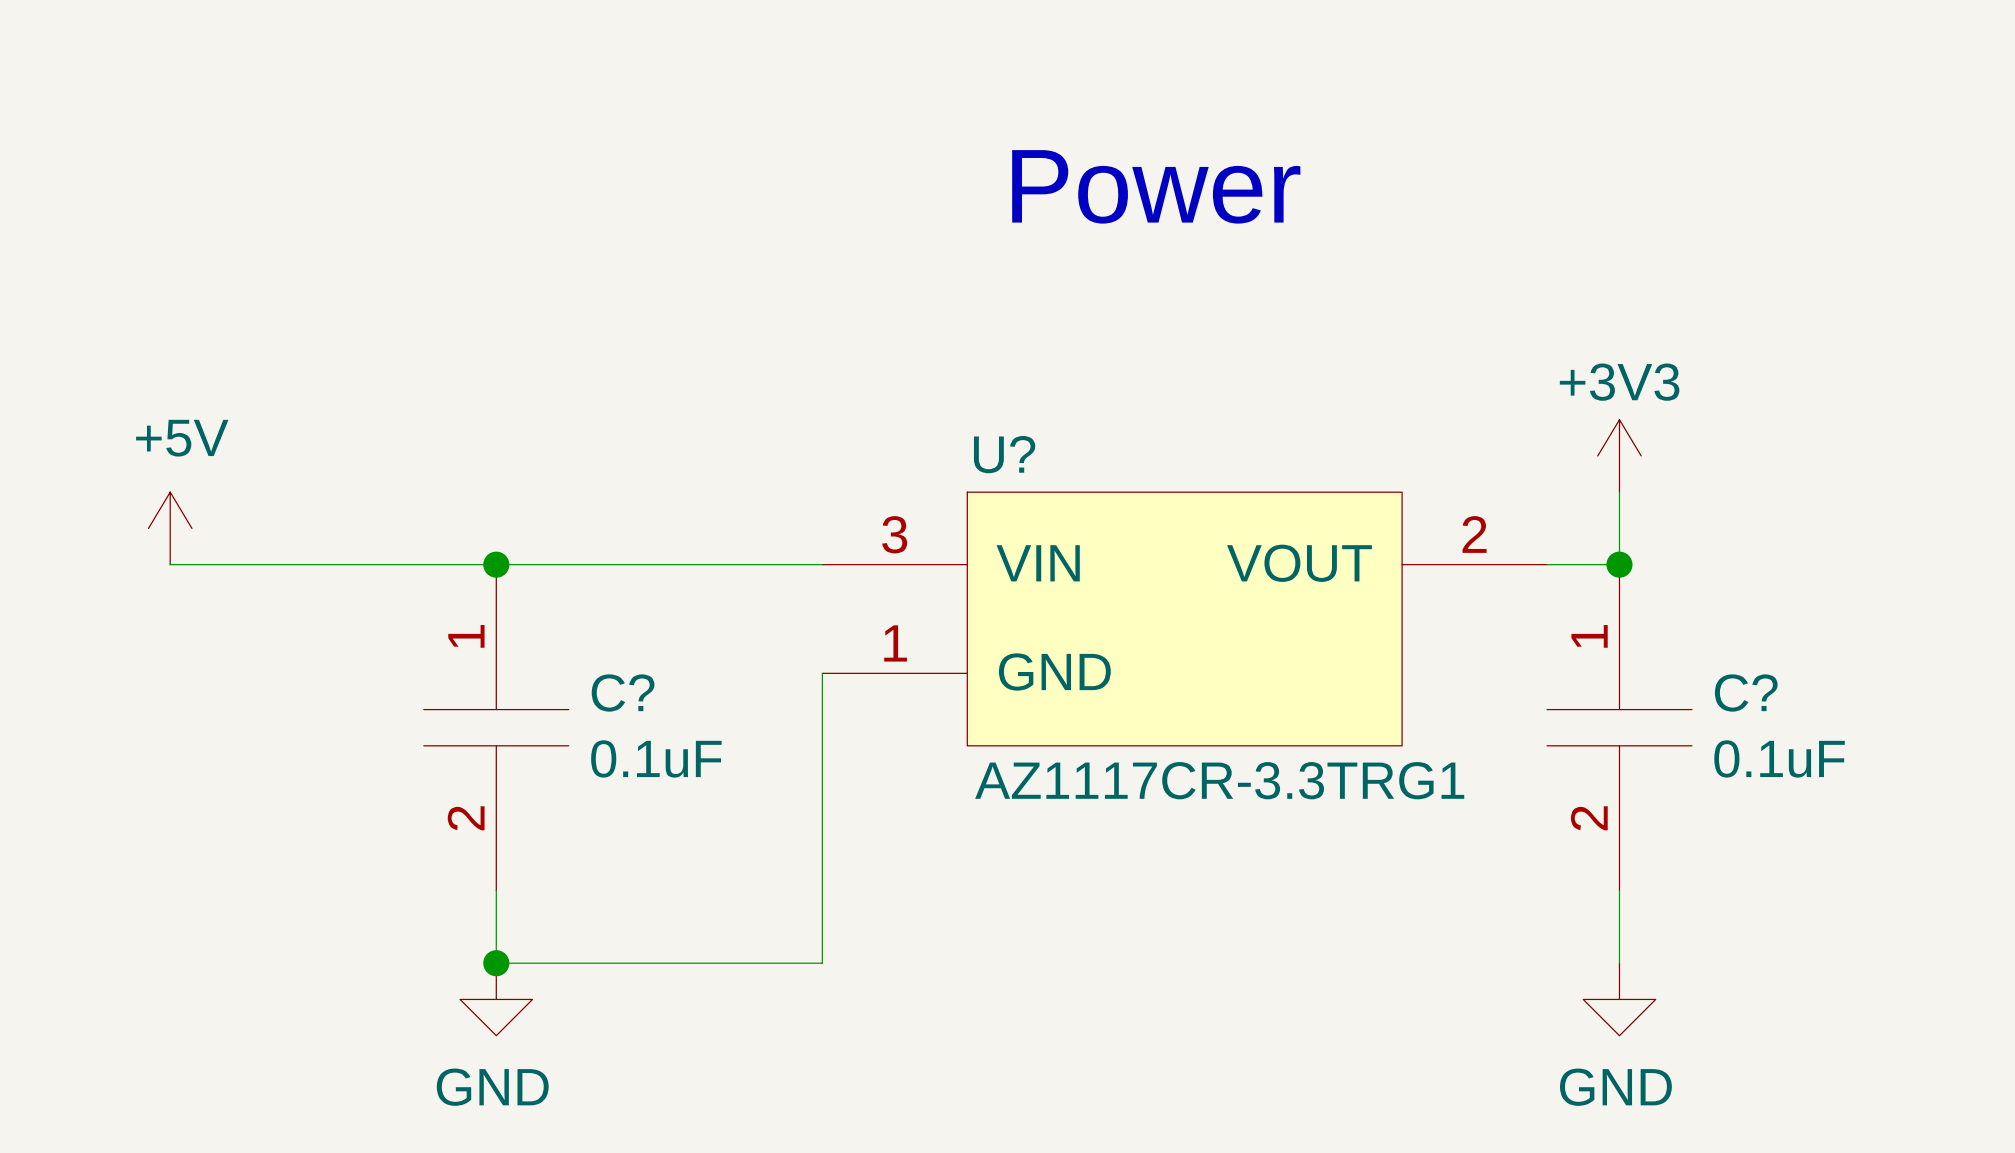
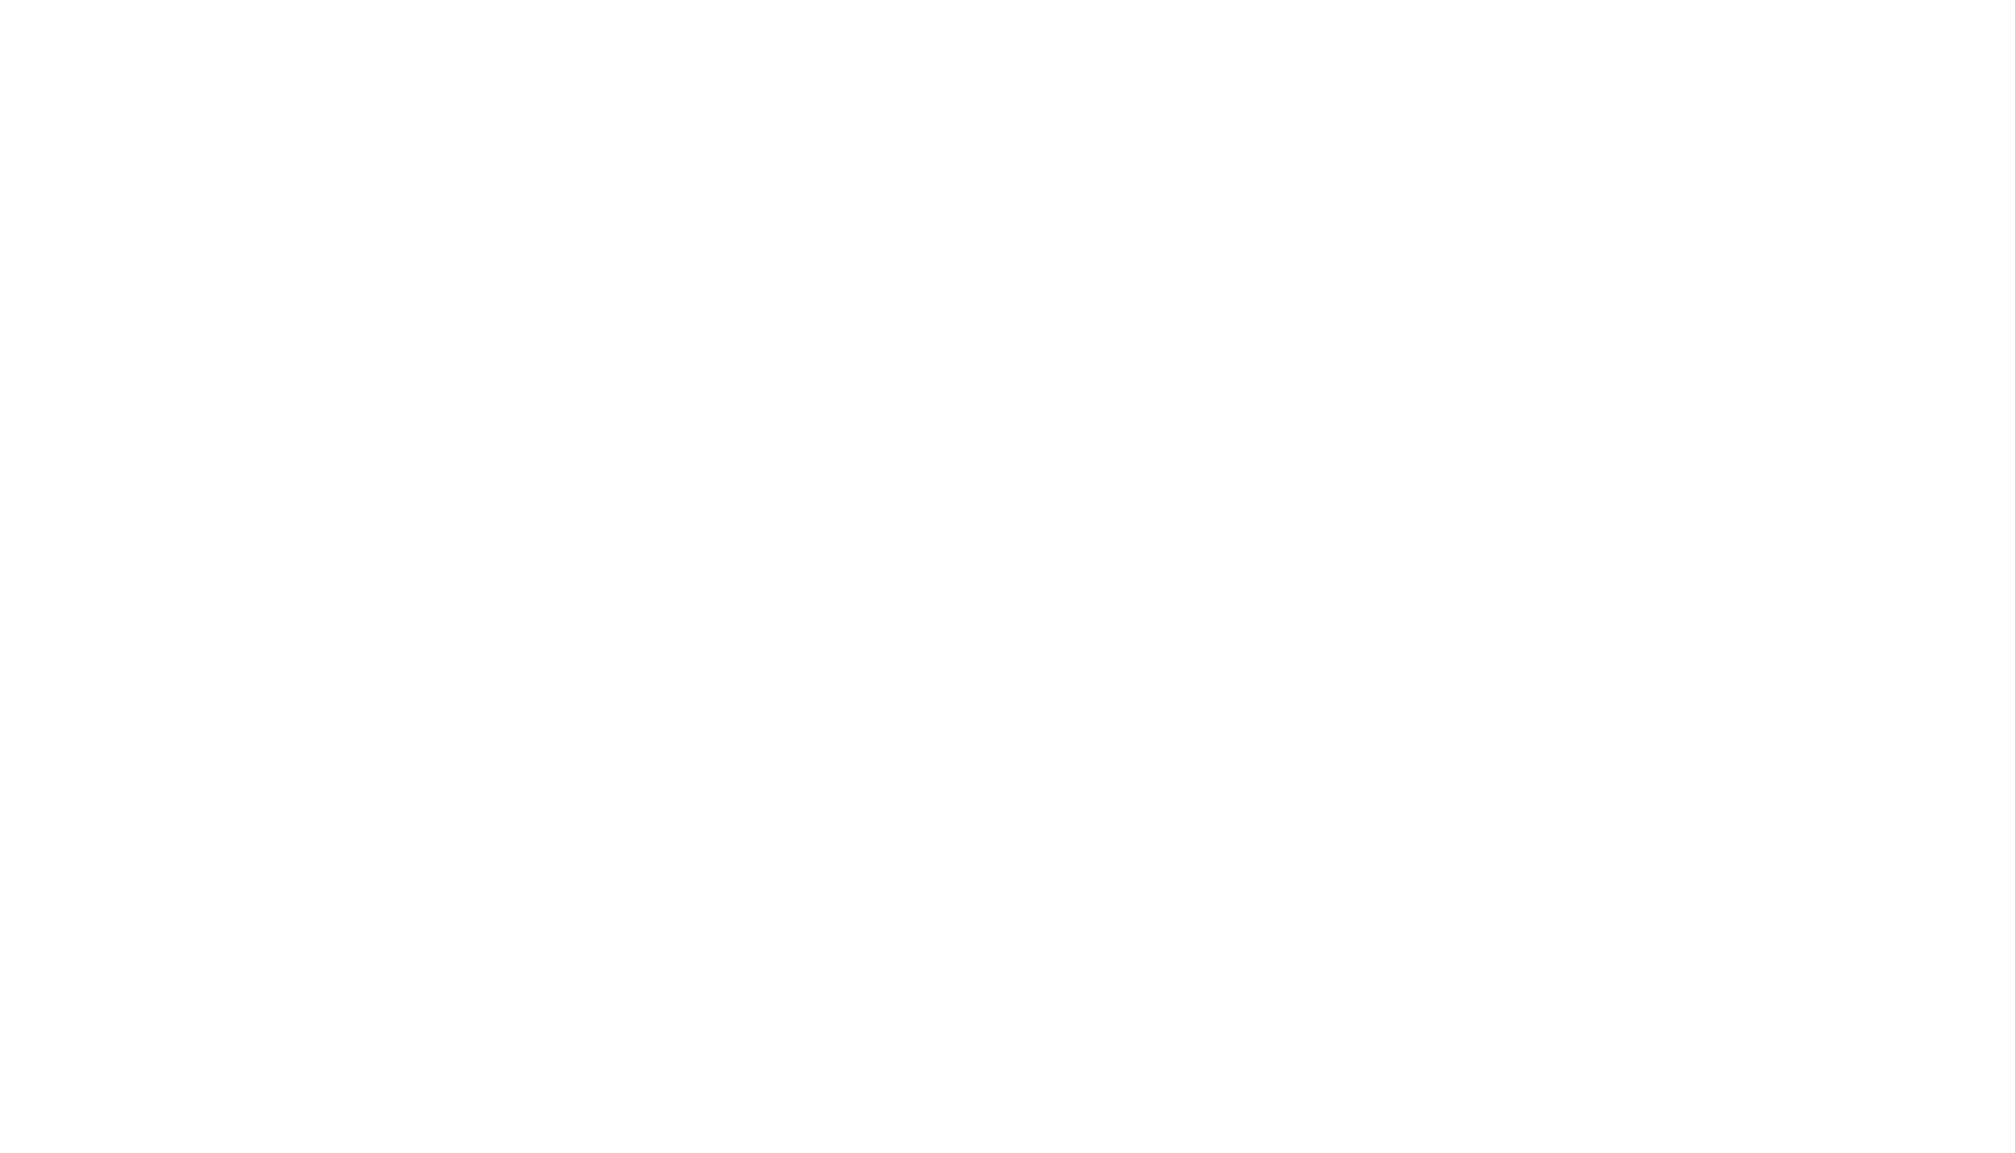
text: Power (1156, 186) -> none
power symbol: +3V3 (1619, 455) -> none
wire: (1619, 492) (1619, 564) (1547, 564) -> none
power symbol: +5V (170, 528) -> none
wire: (170, 564) (822, 564) -> none
junction: (496, 564) -> none
junction: (1619, 564) -> none
U?: (1184, 619) -> none
wire: (822, 673) (822, 963) (496, 963) (496, 890) -> none
C?: (496, 727) -> none
C?: (1619, 727) -> none
wire: (1619, 890) (1619, 963) -> none
junction: (496, 963) -> none
power symbol: GND (496, 999) -> none
power symbol: GND (1619, 999) -> none

